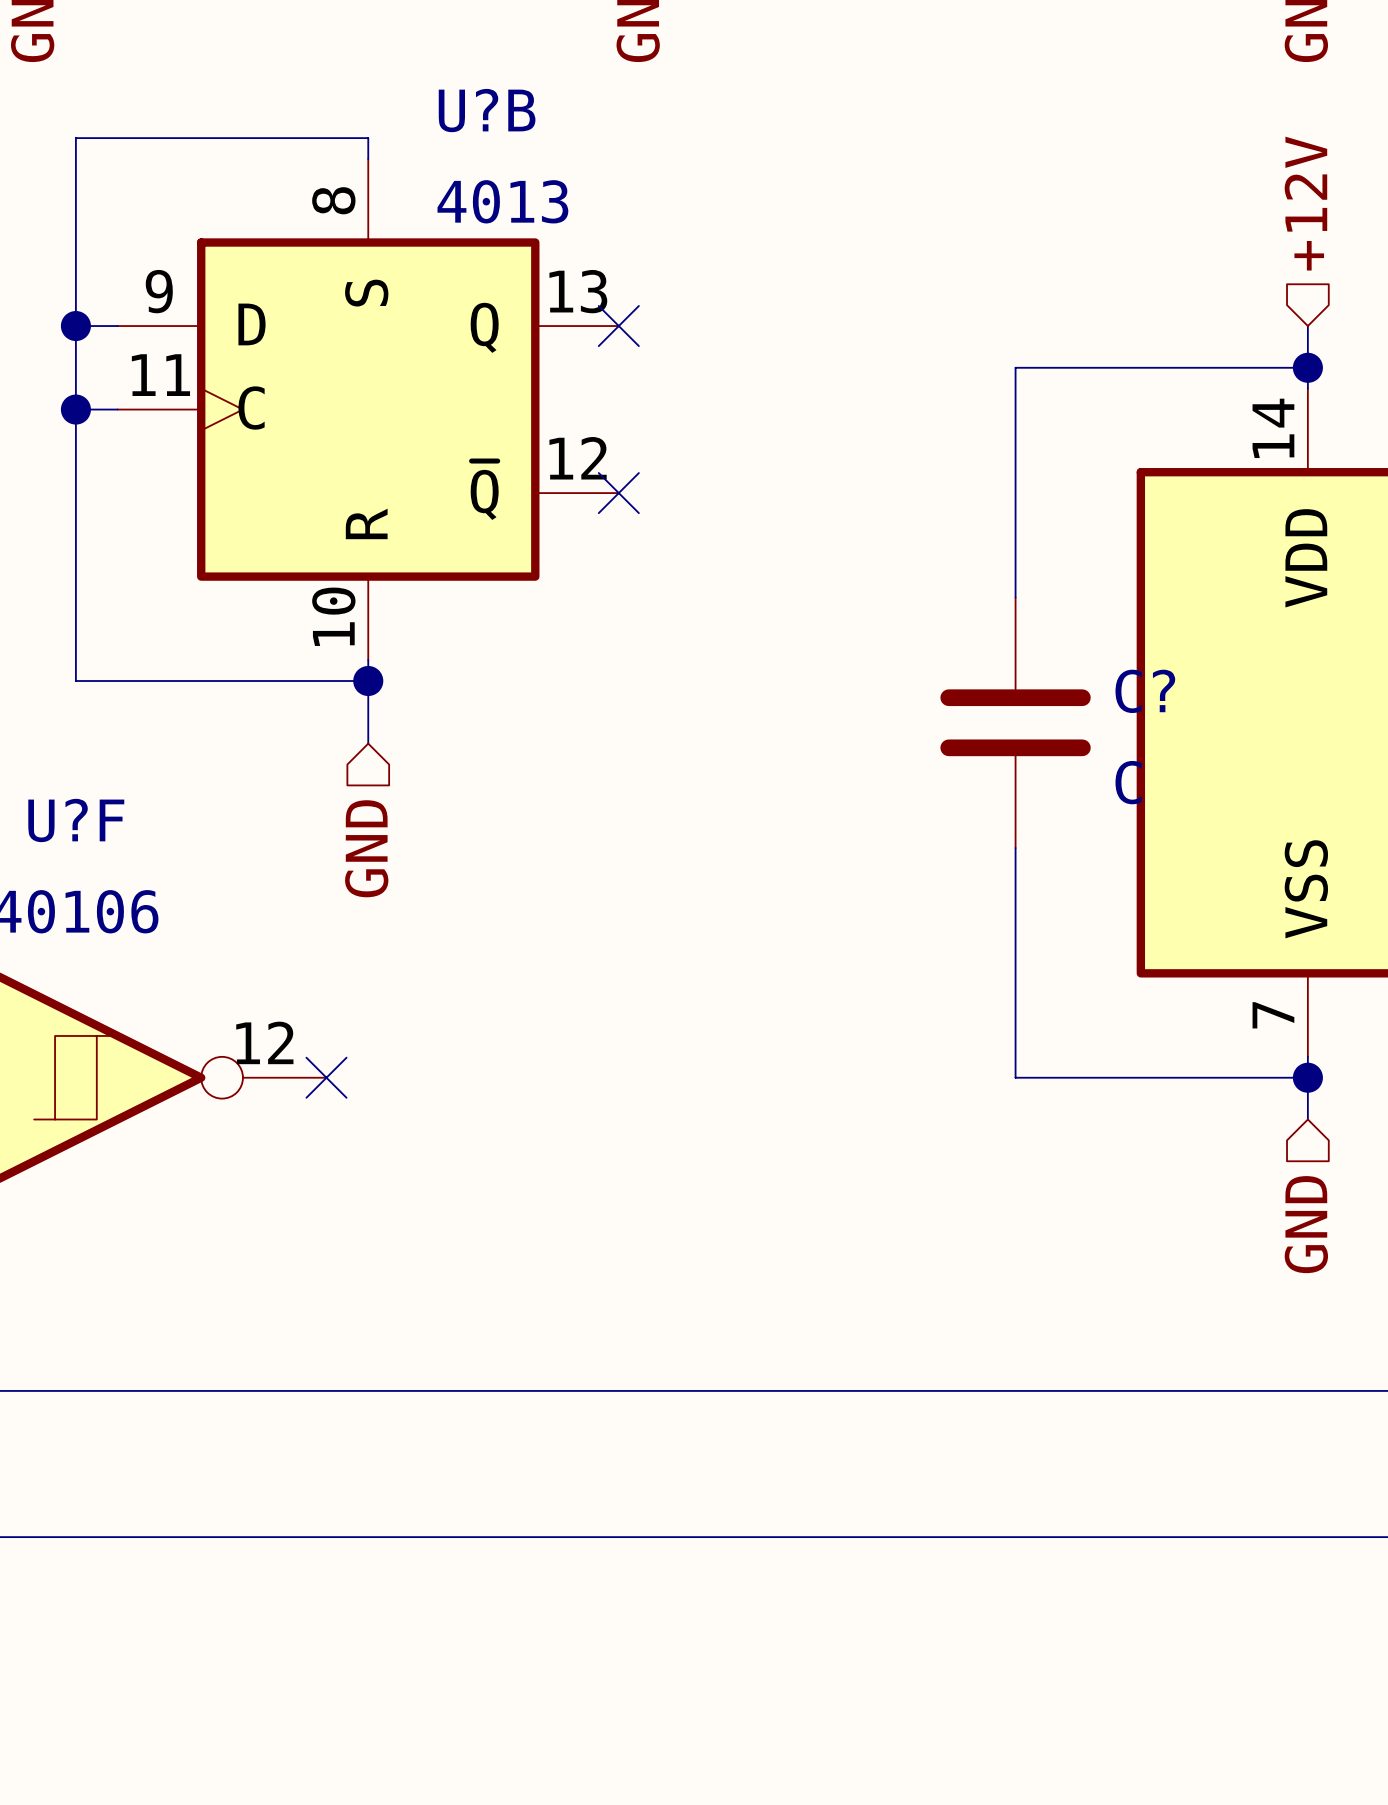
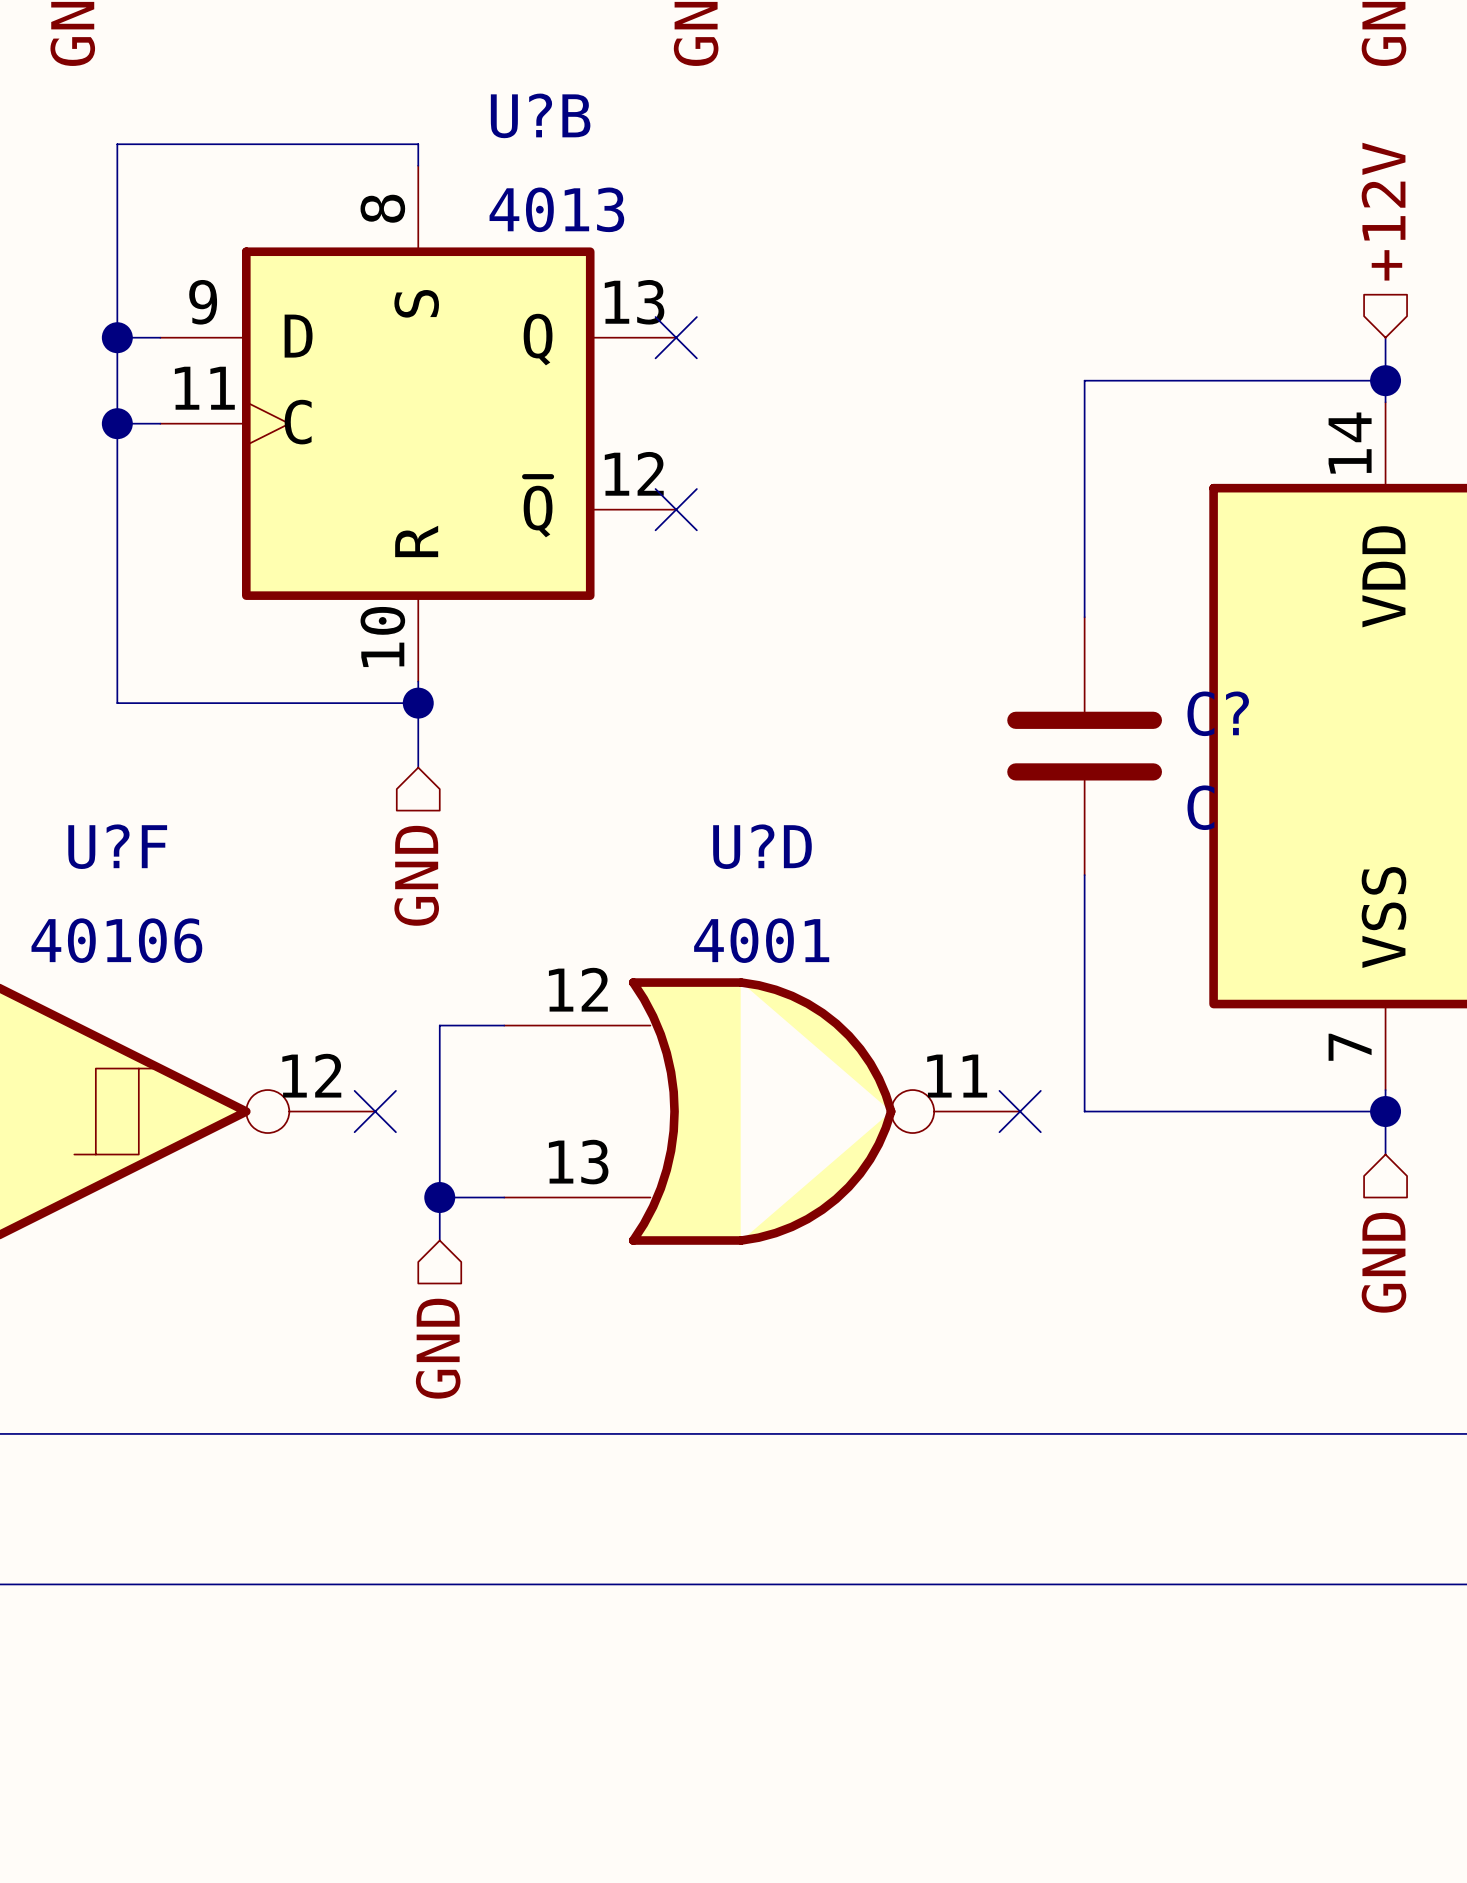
wire: none -> (504, 1025) (439, 1025) (439, 1240)
U?D: none -> 4001 (762, 1111)
no-connect mark: none -> (1020, 1111)
wire: none -> (439, 1197) (504, 1197)
junction: none -> (439, 1197)
hierarchical label: none -> GND (438, 1348)

